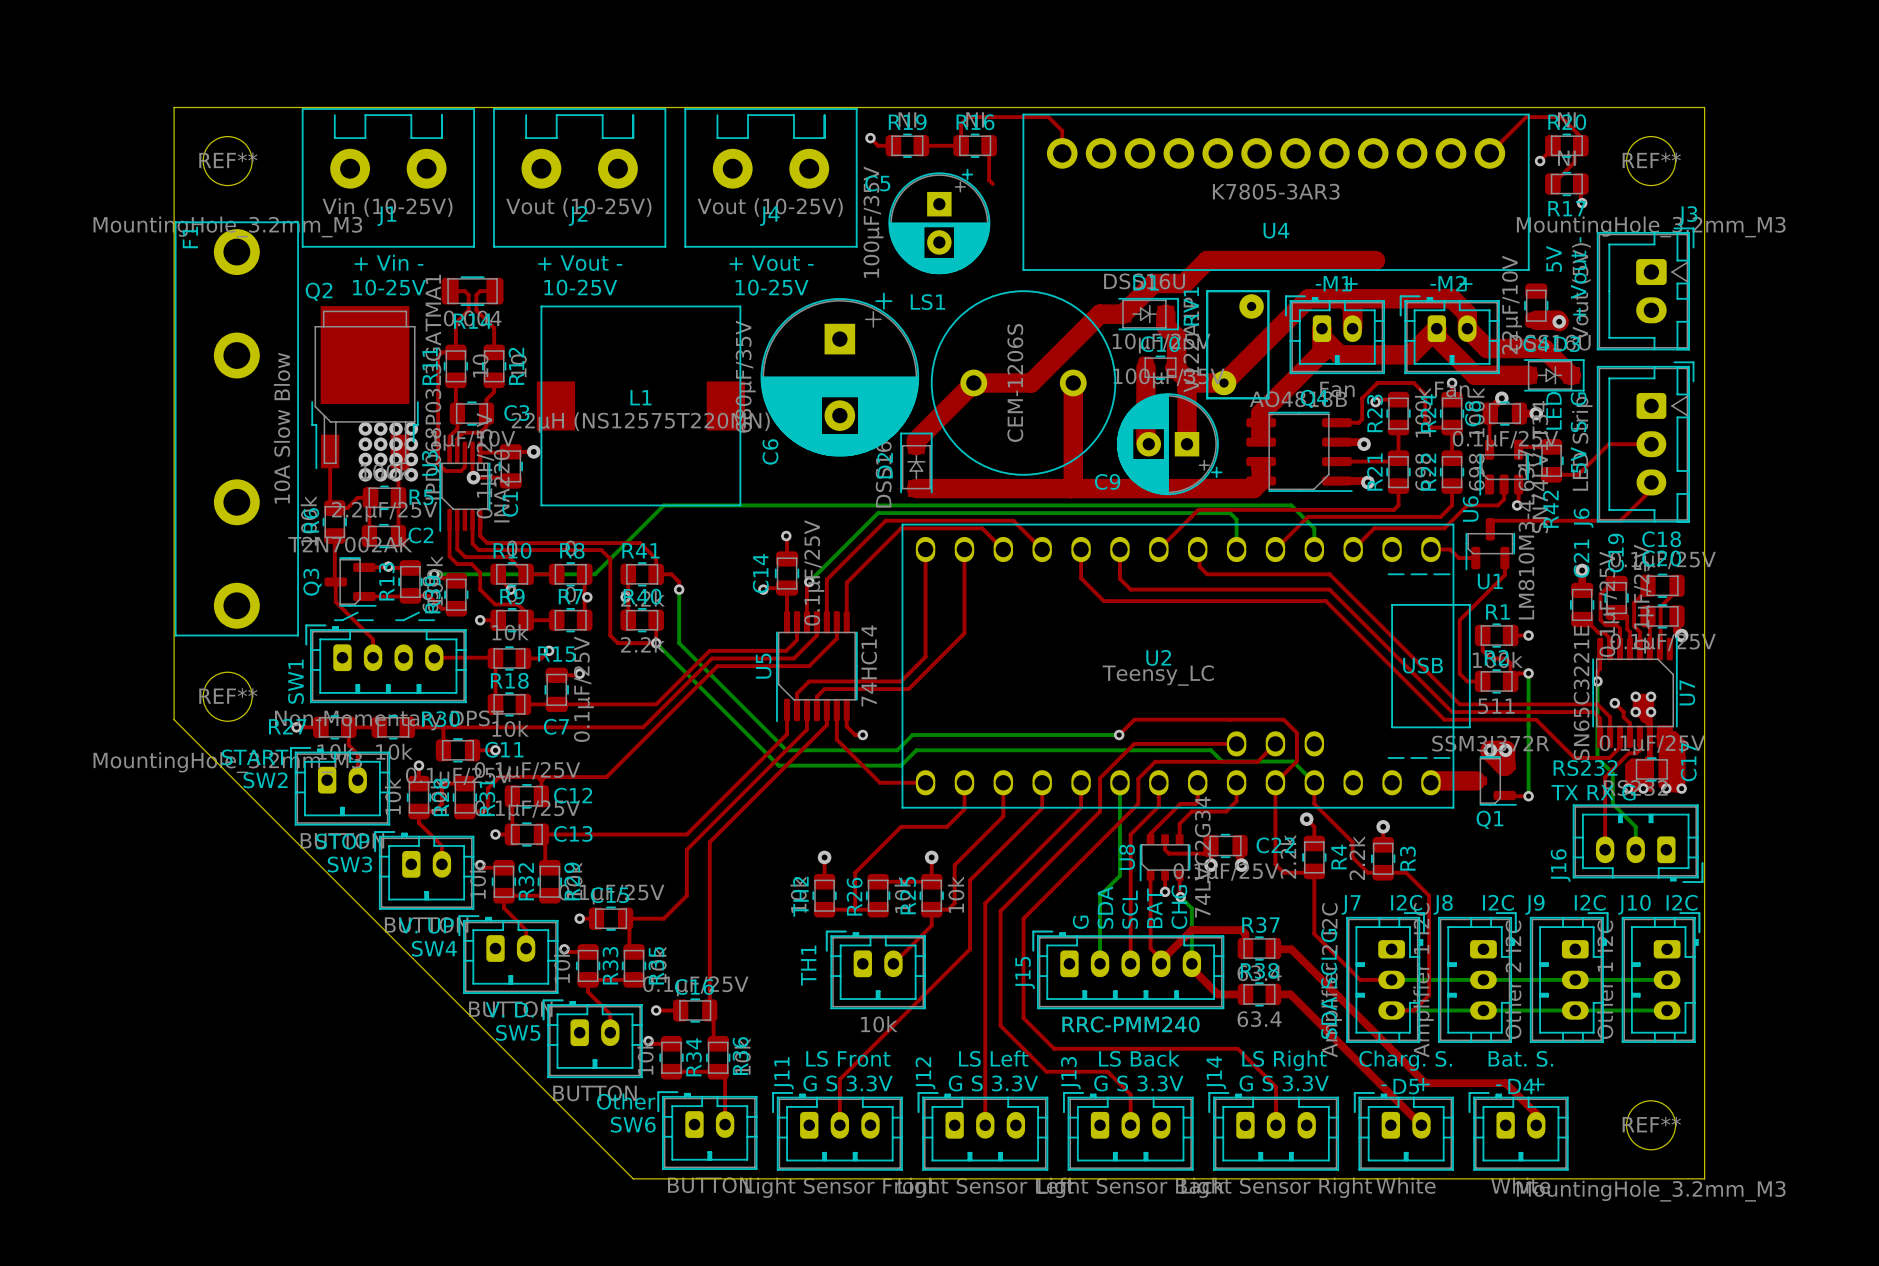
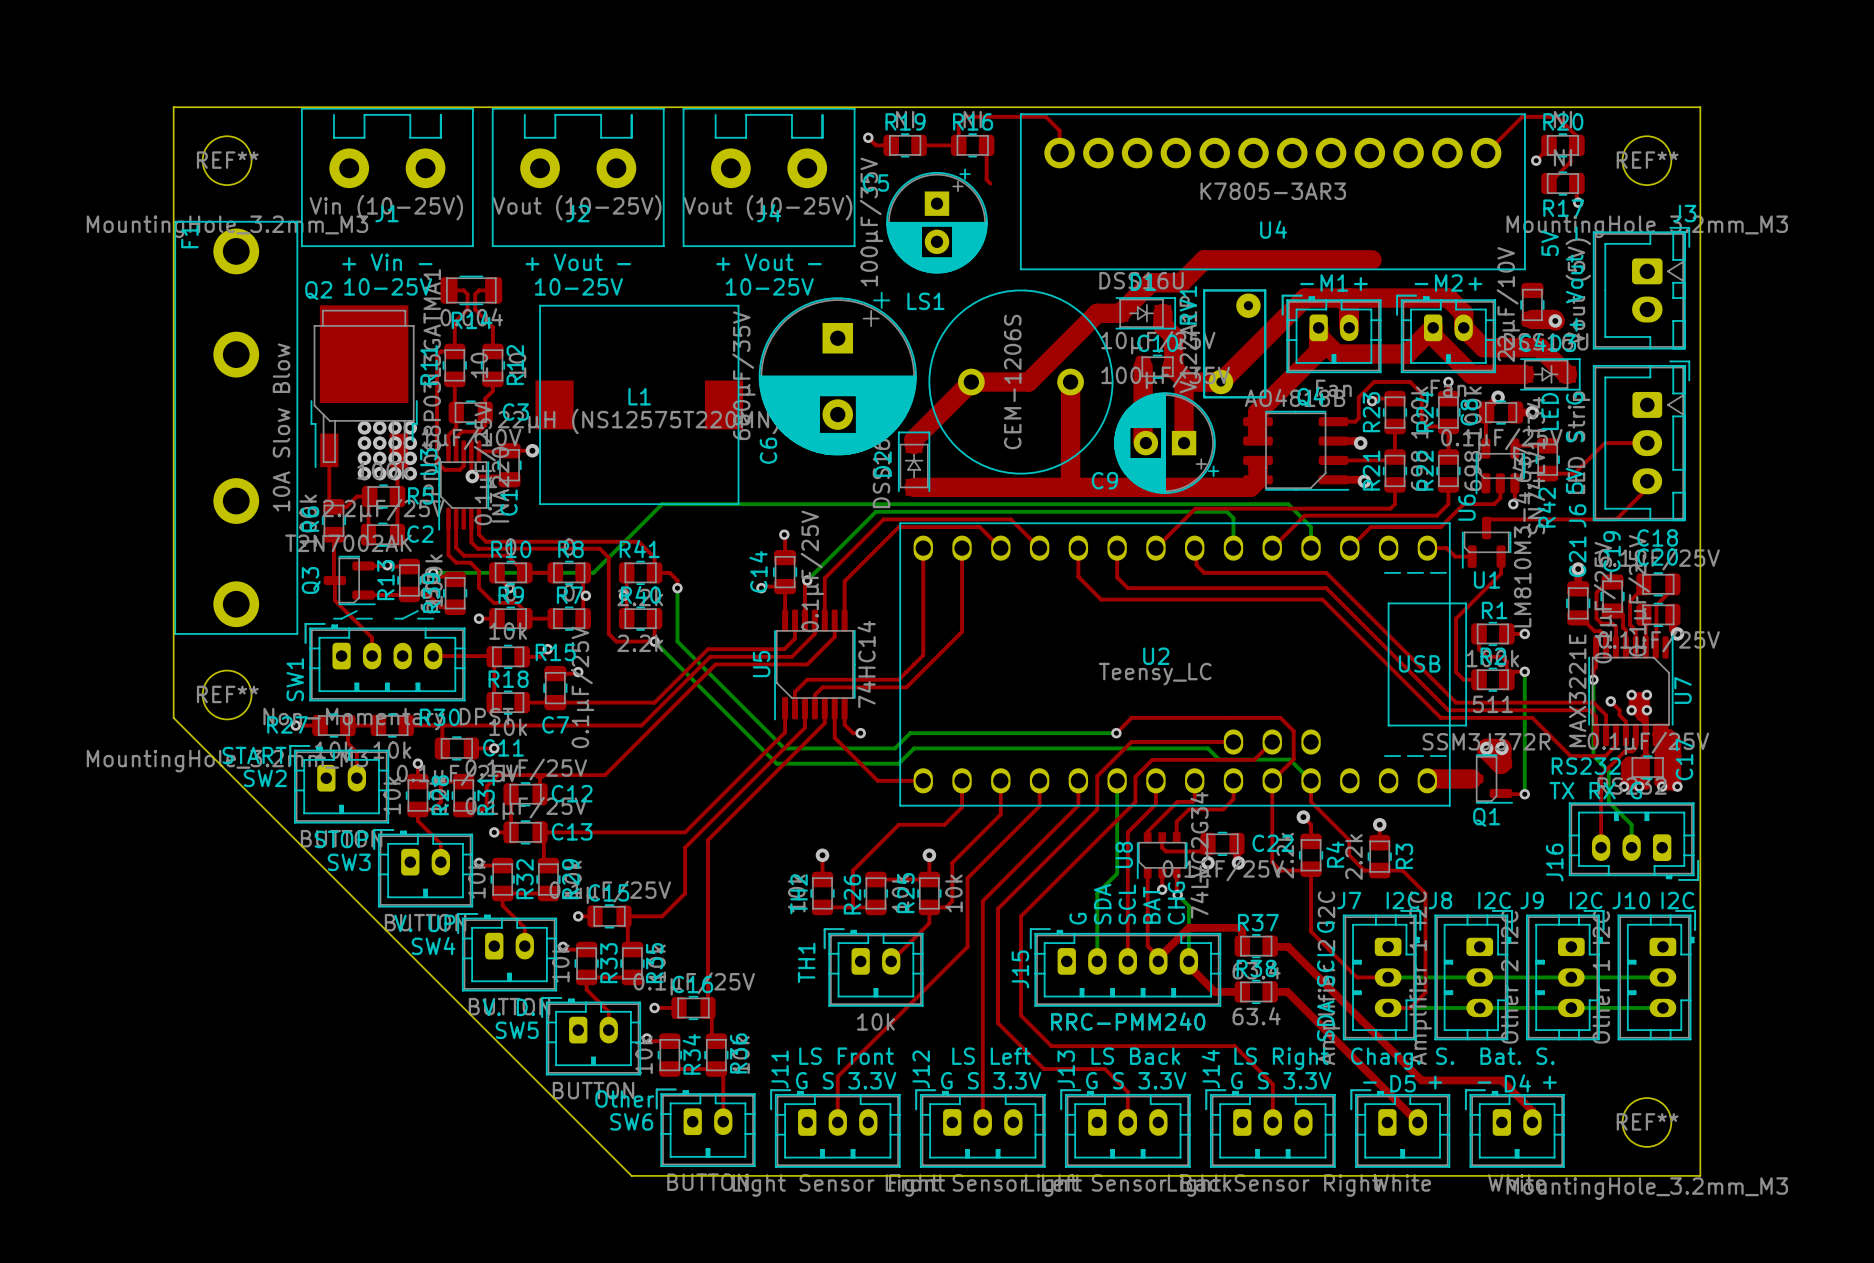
U7 value: SN65C3221E (1581, 692) -> MAX3221E (1577, 690)

